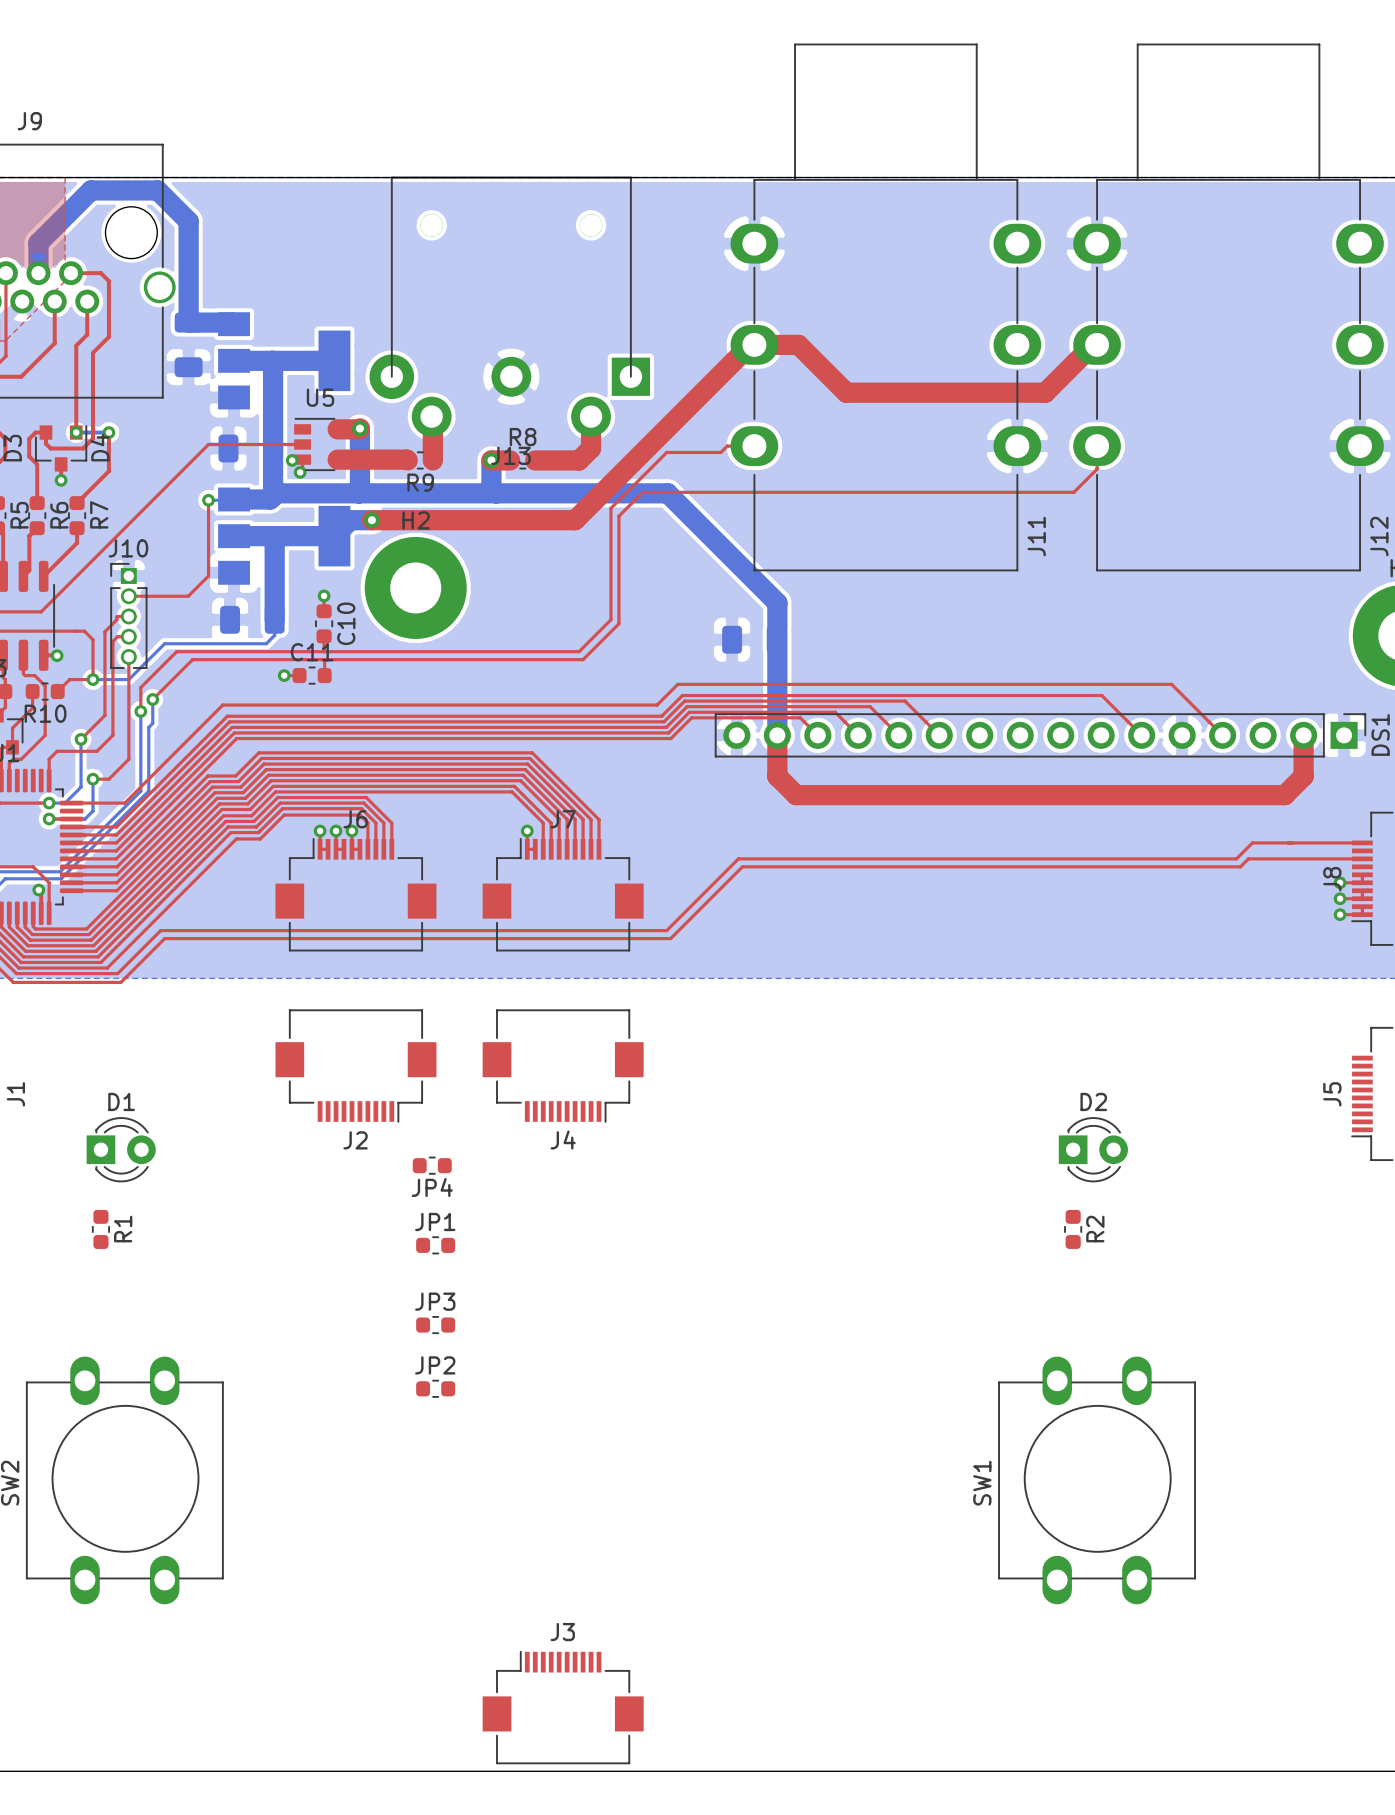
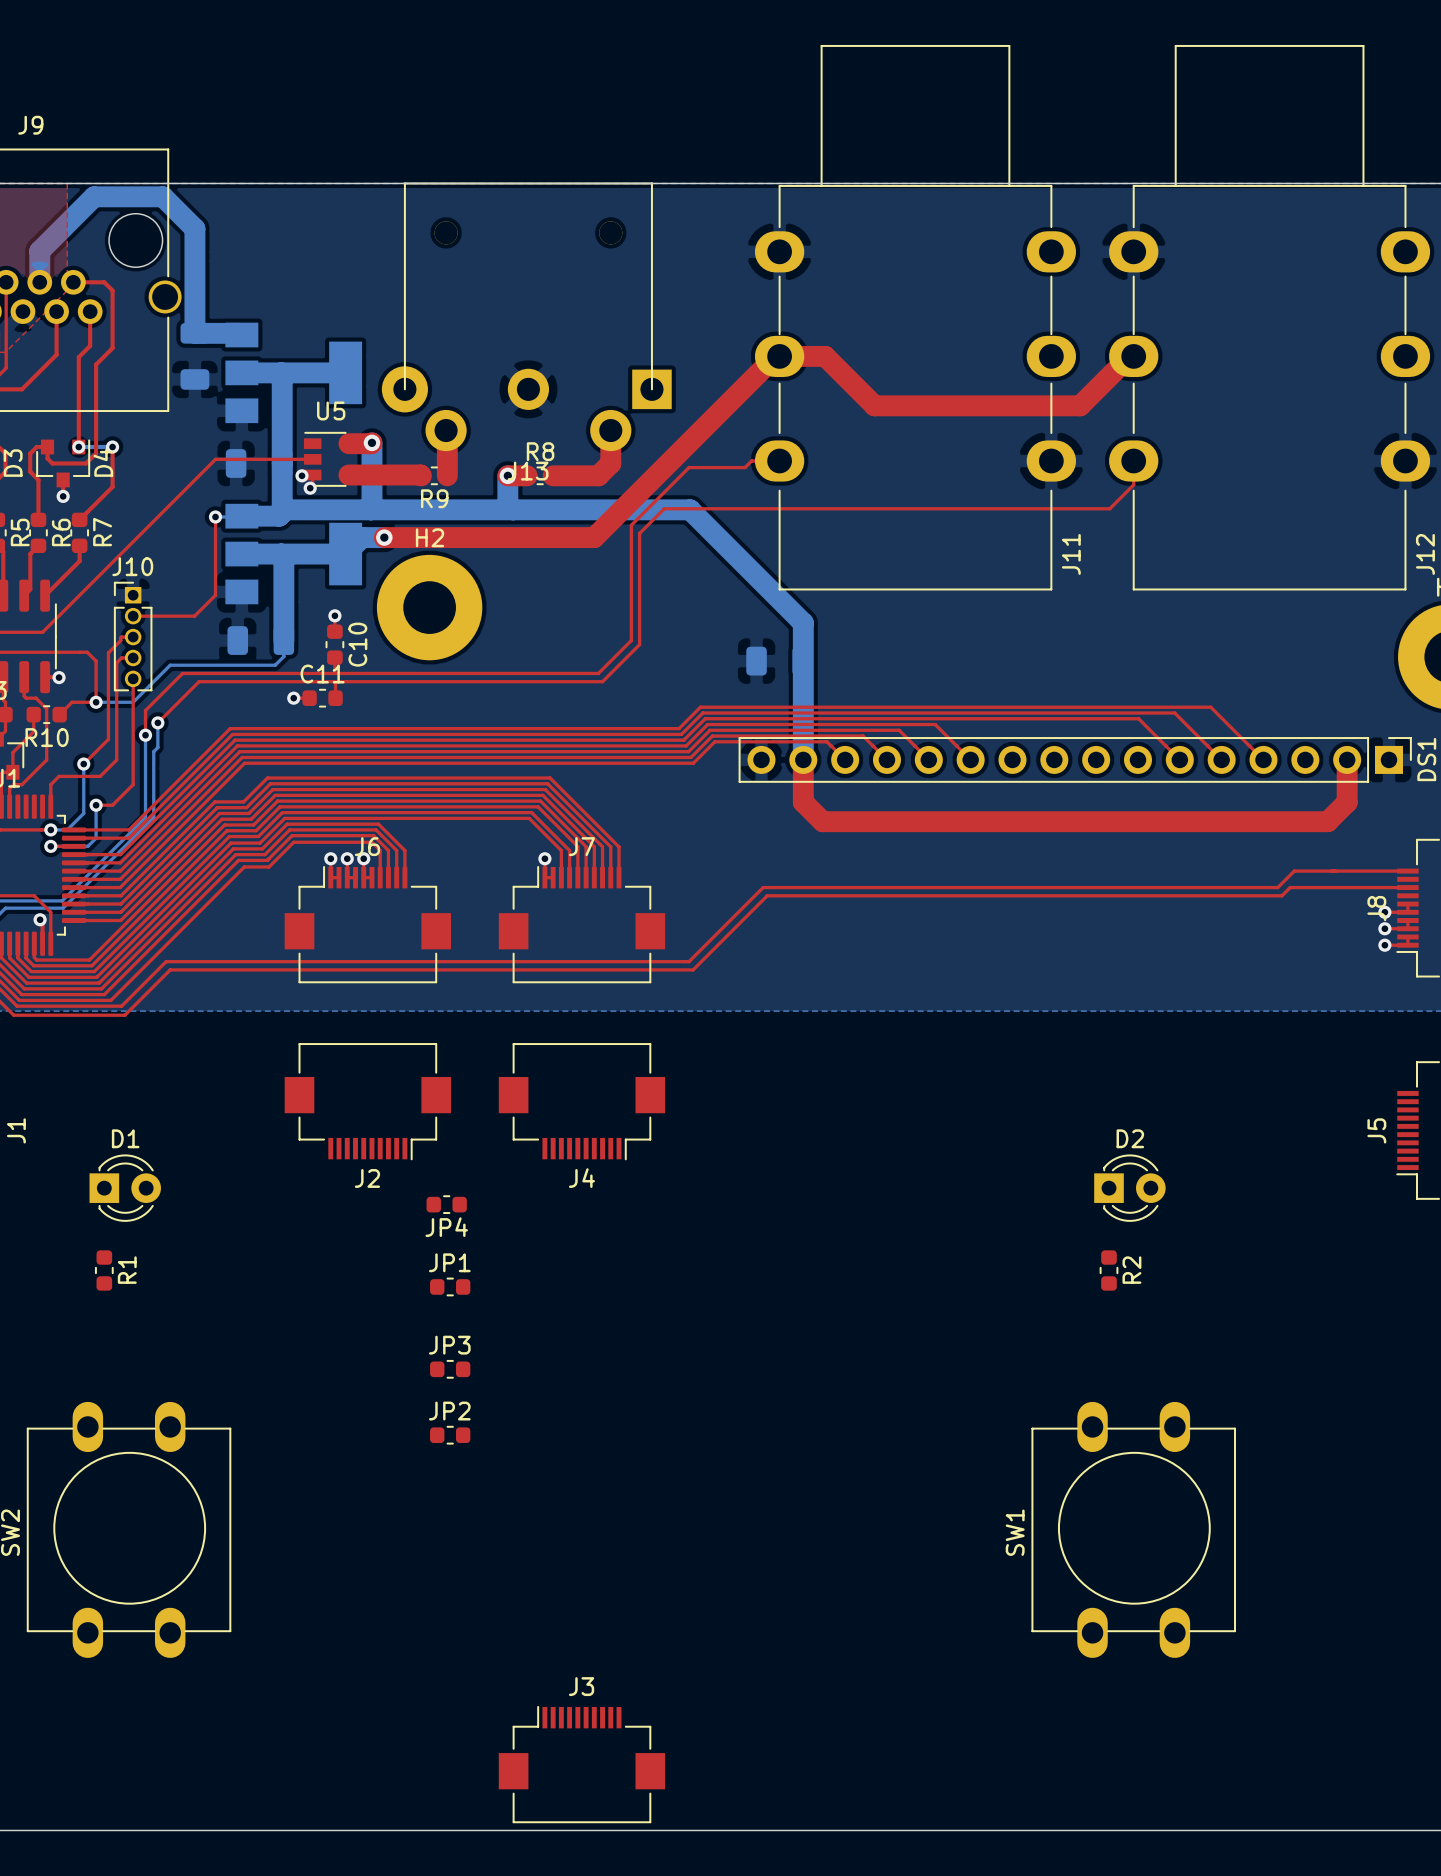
top track: none -> (1221, 759) (1174, 712) (702, 712) (681, 734) (232, 734) (128, 838) (74, 838)

